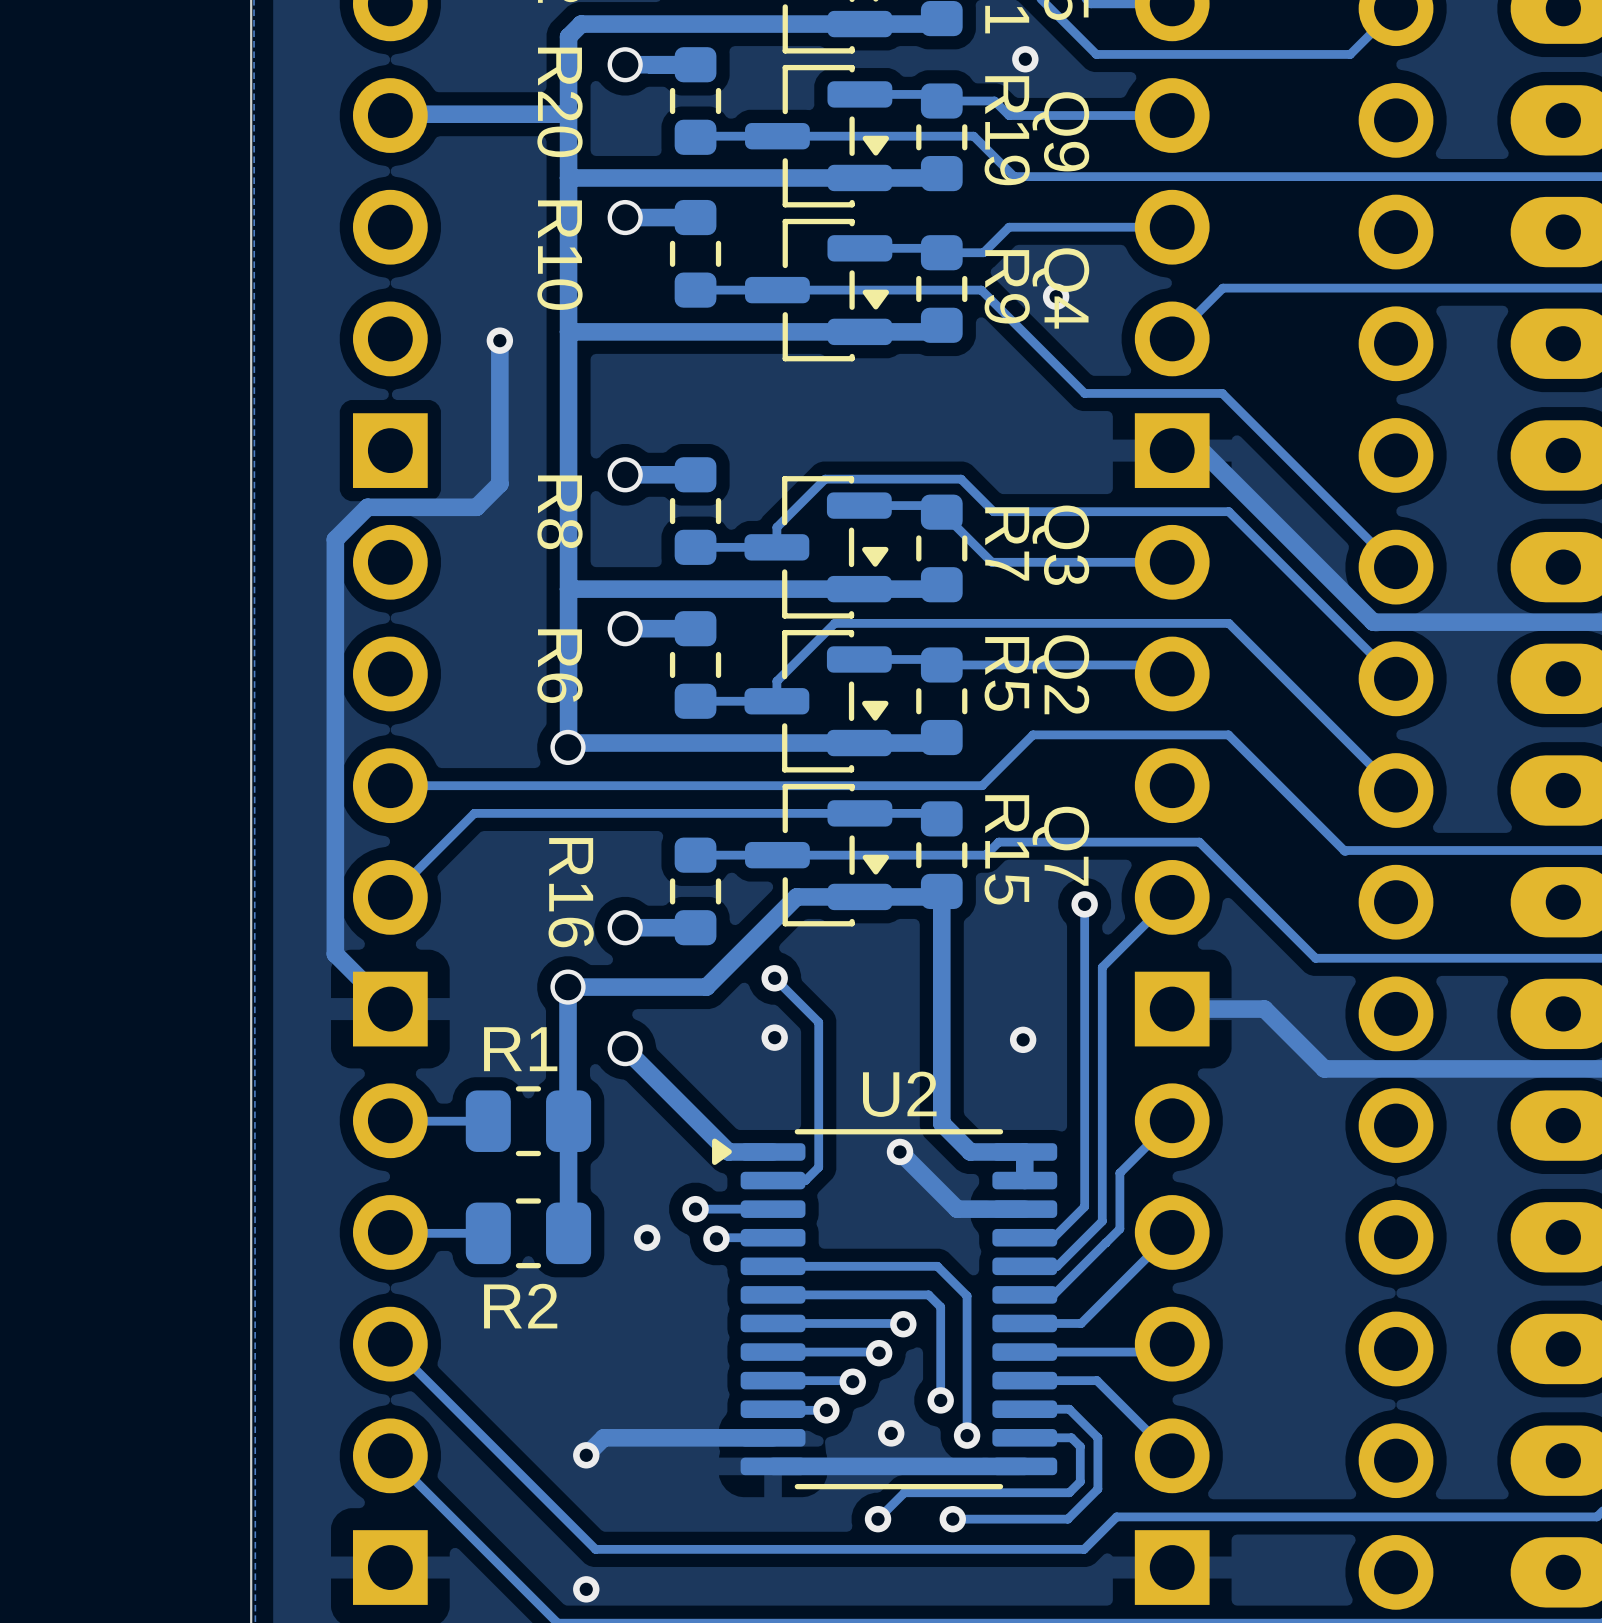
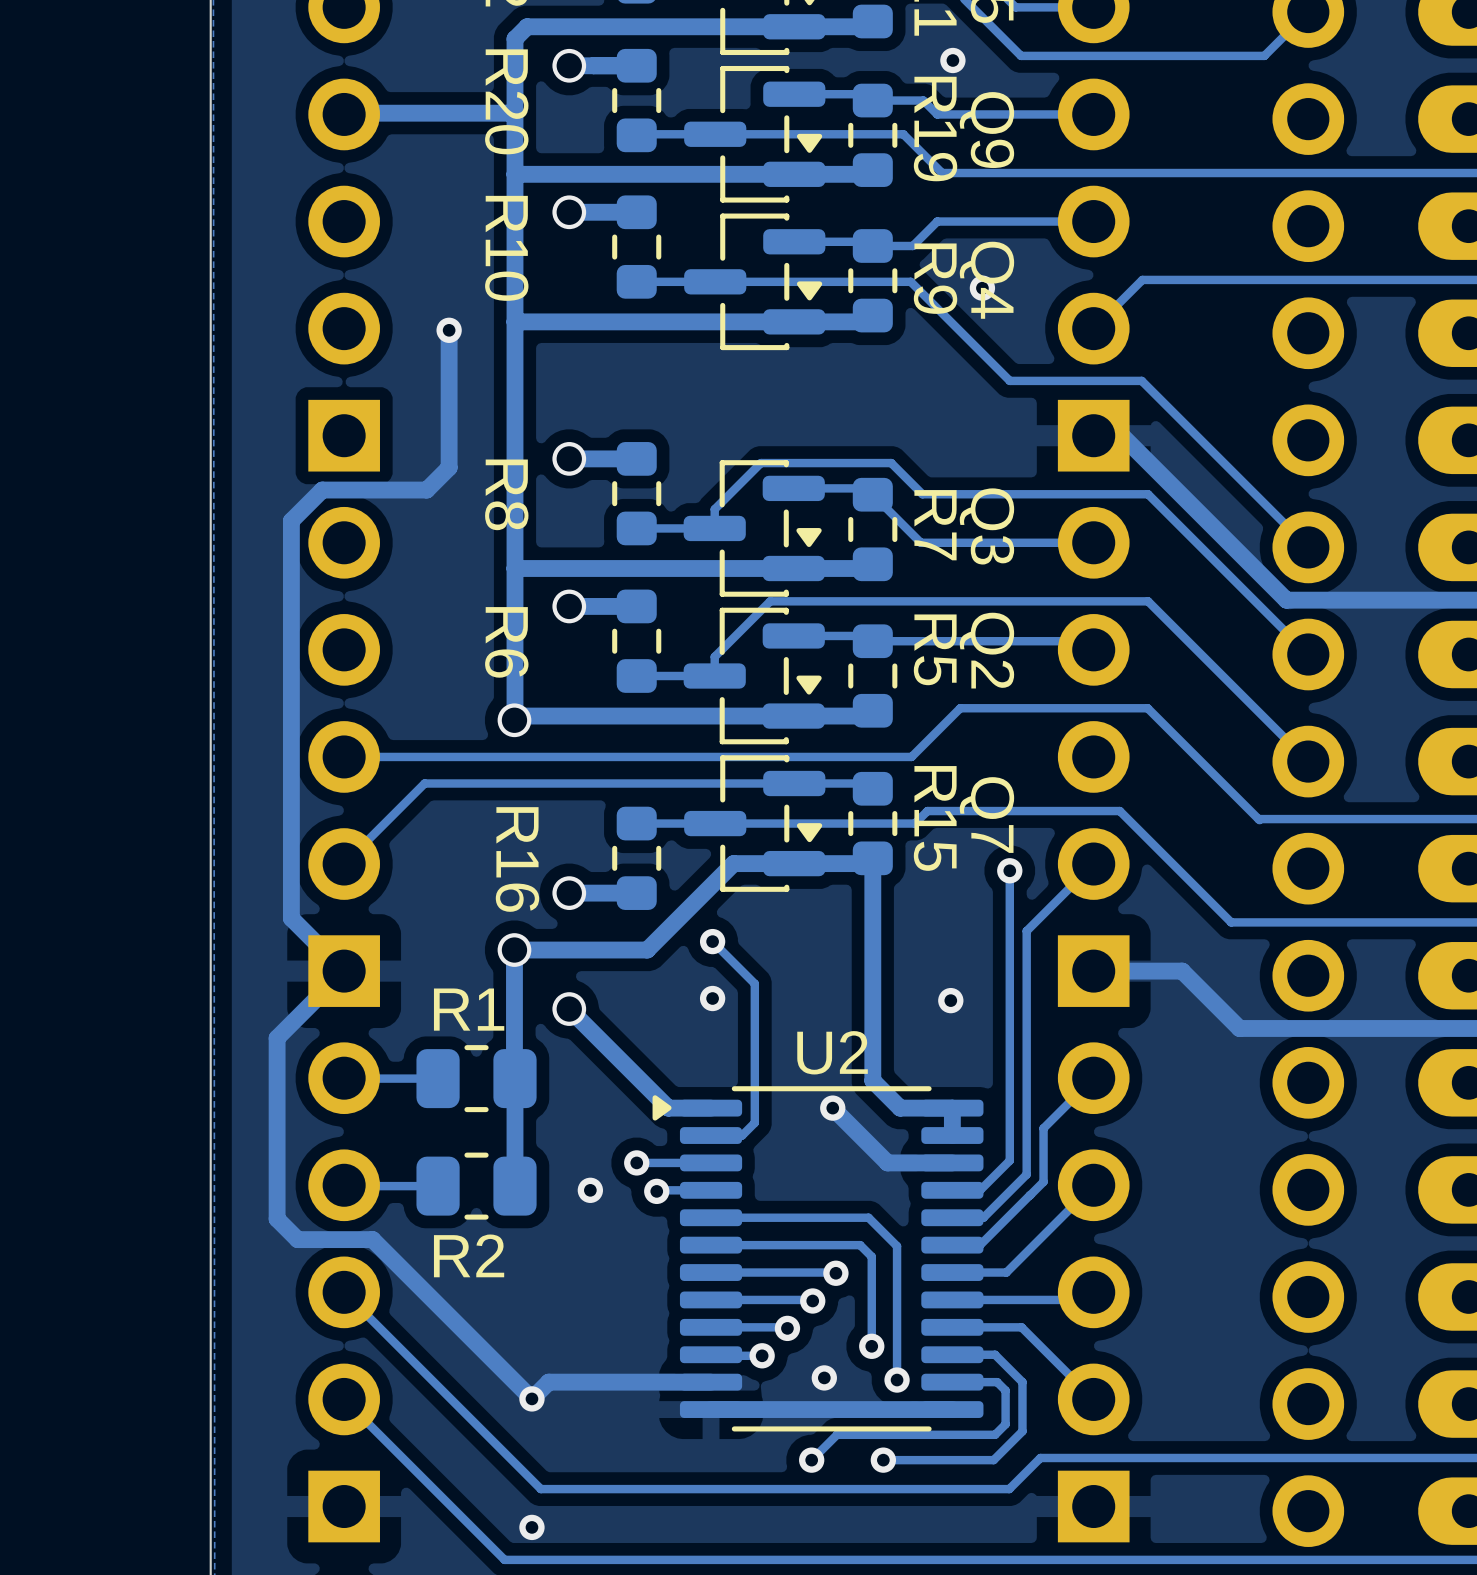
track: none -> (344, 971) (277, 1038) (277, 1219) (297, 1239) (372, 1239) (531, 1398)

